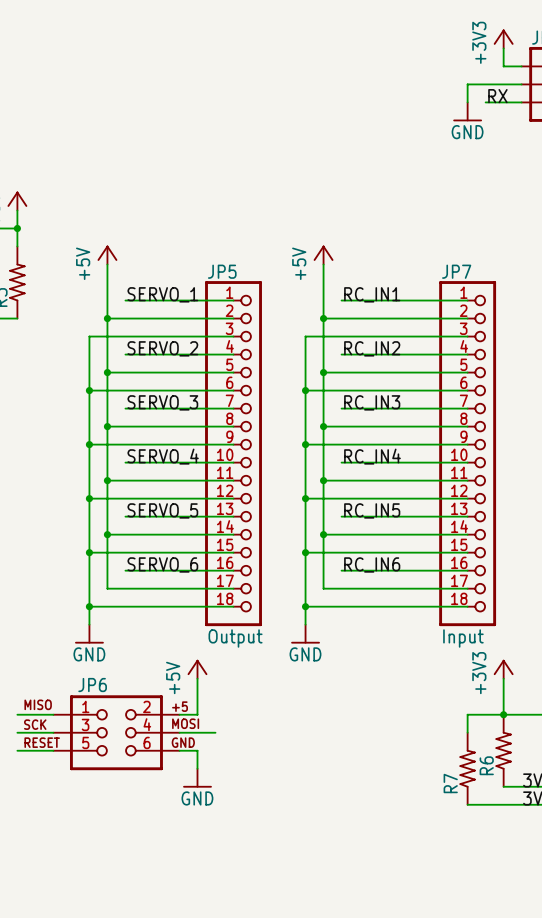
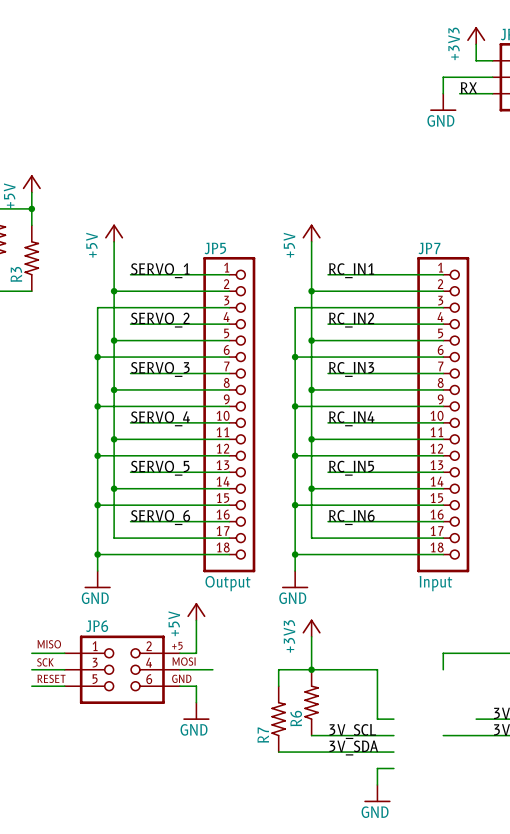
power symbol: +3V3 (503, 669) -> none
wire: (503, 678) (503, 714) -> none
power symbol: none -> +3V3 (311, 628)
wire: none -> (311, 636) (311, 669)
junction: (503, 714) -> none
junction: none -> (311, 669)
wire: none -> (278, 686) (278, 669) (377, 669) (377, 719) (393, 719)
R6 position: (503, 750) -> (311, 702)
R7 position: (467, 768) -> (278, 719)
label: none -> 3V_SCL (352, 731)
wire: none -> (311, 735) (393, 735)
label: none -> 3V_SDA (353, 748)
wire: none -> (278, 752) (393, 752)
wire: none -> (393, 768) (377, 768) (377, 784)
power symbol: none -> GND (377, 793)

